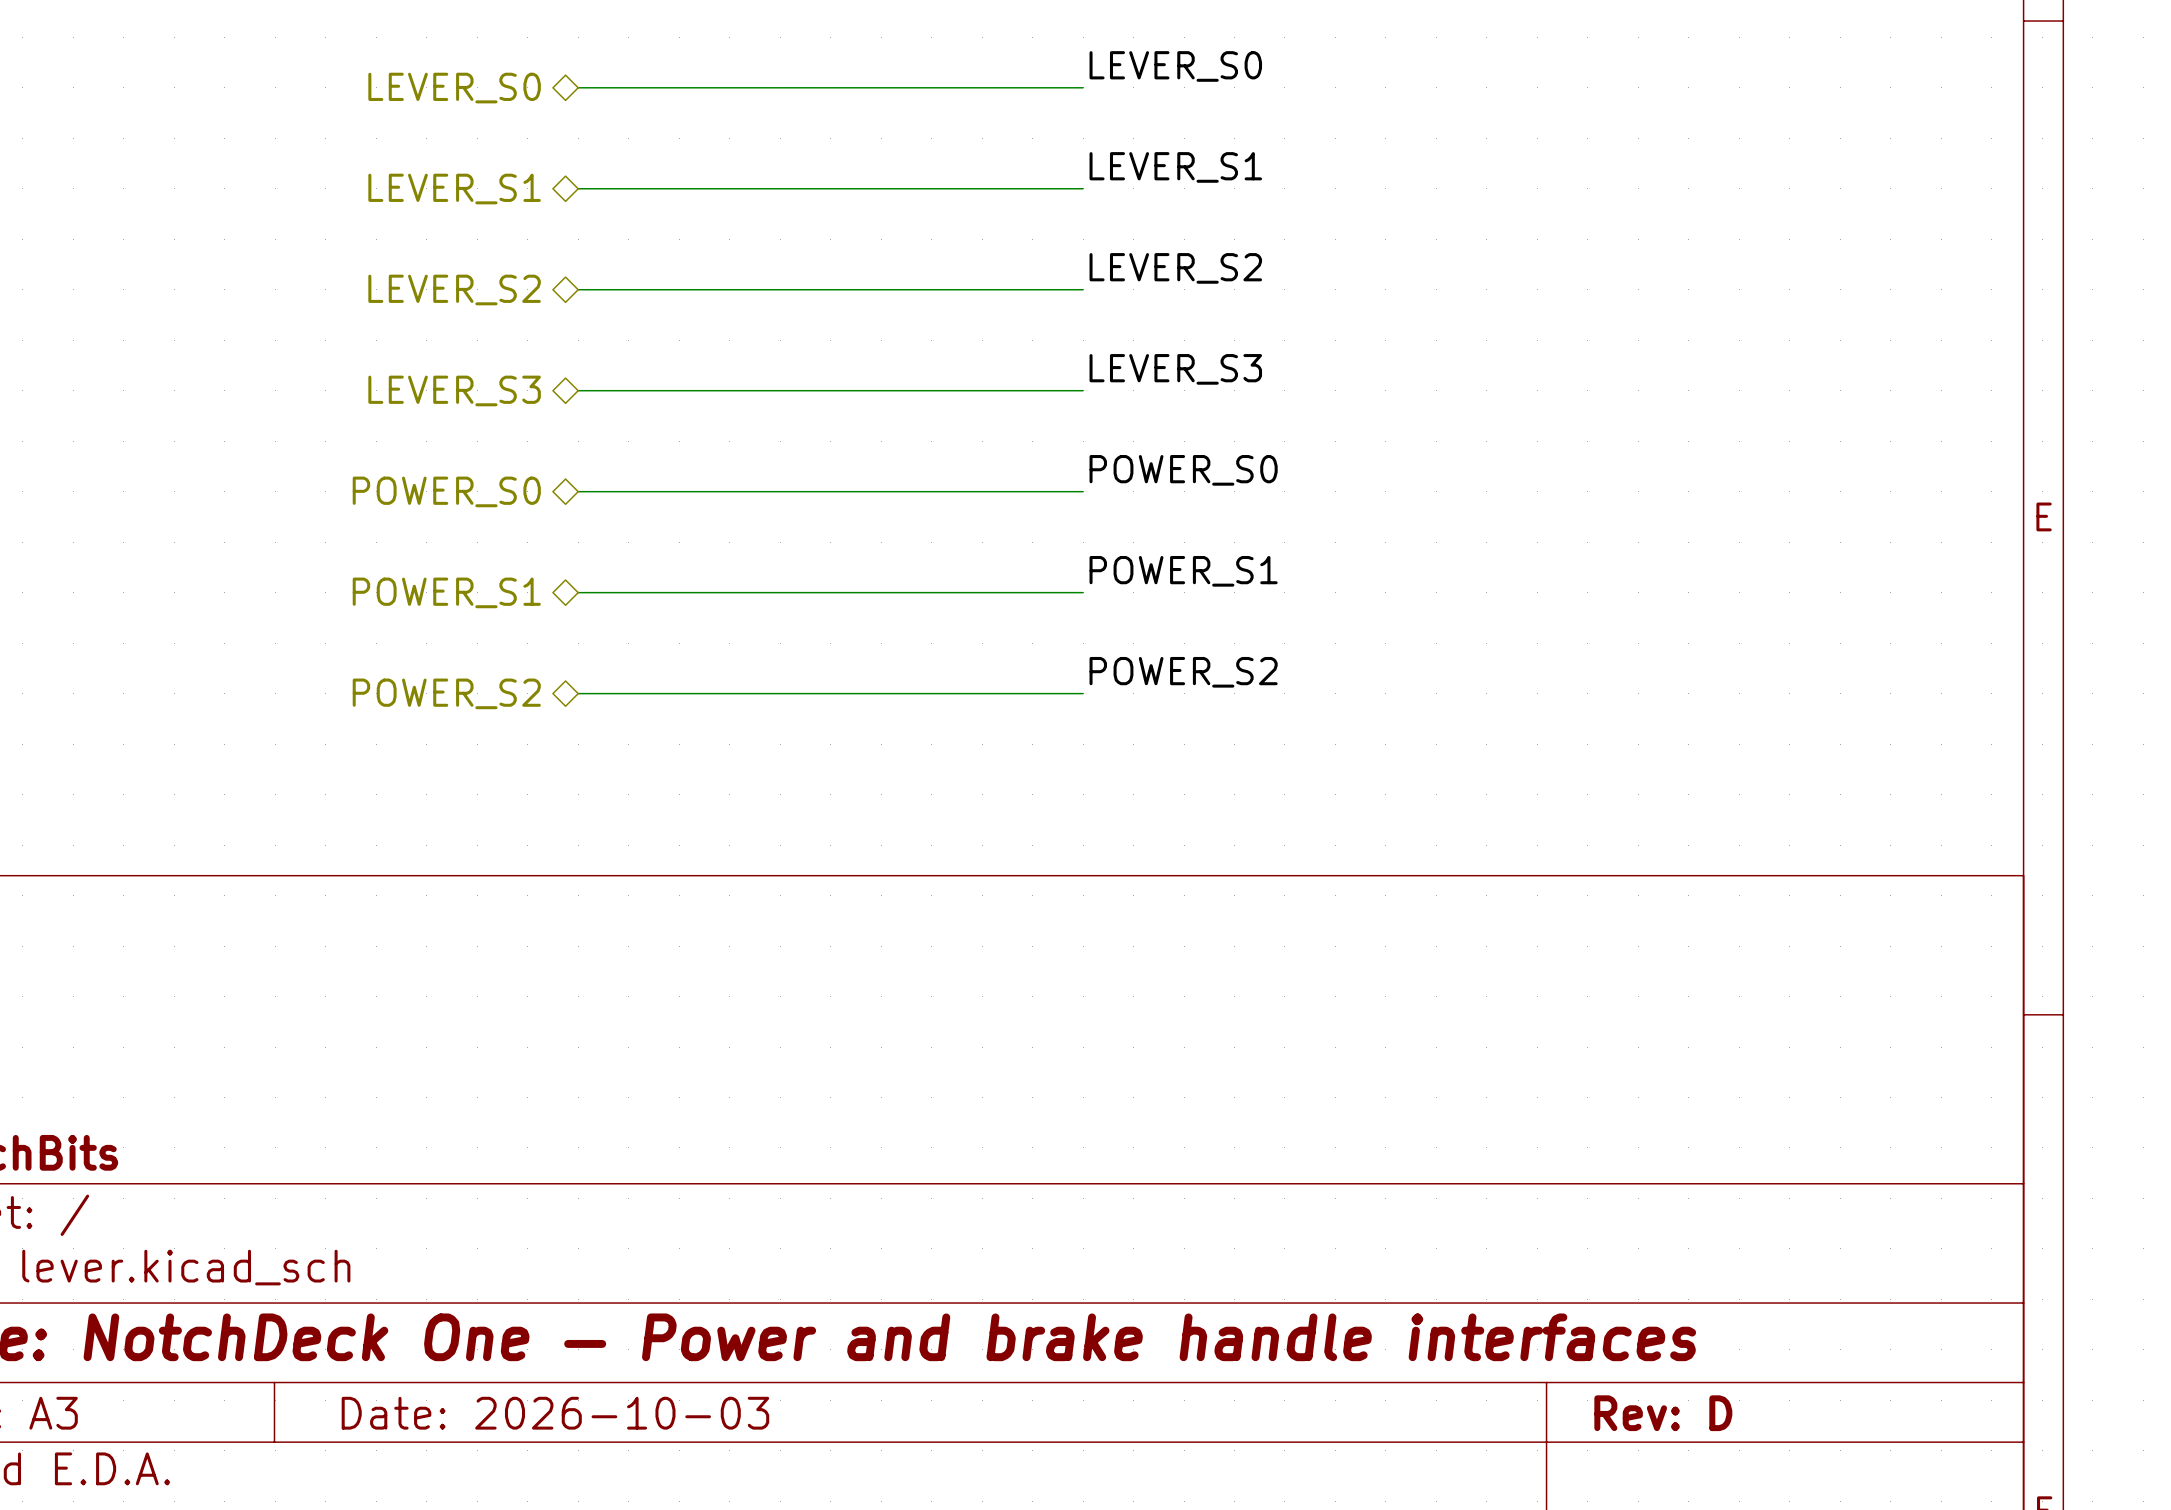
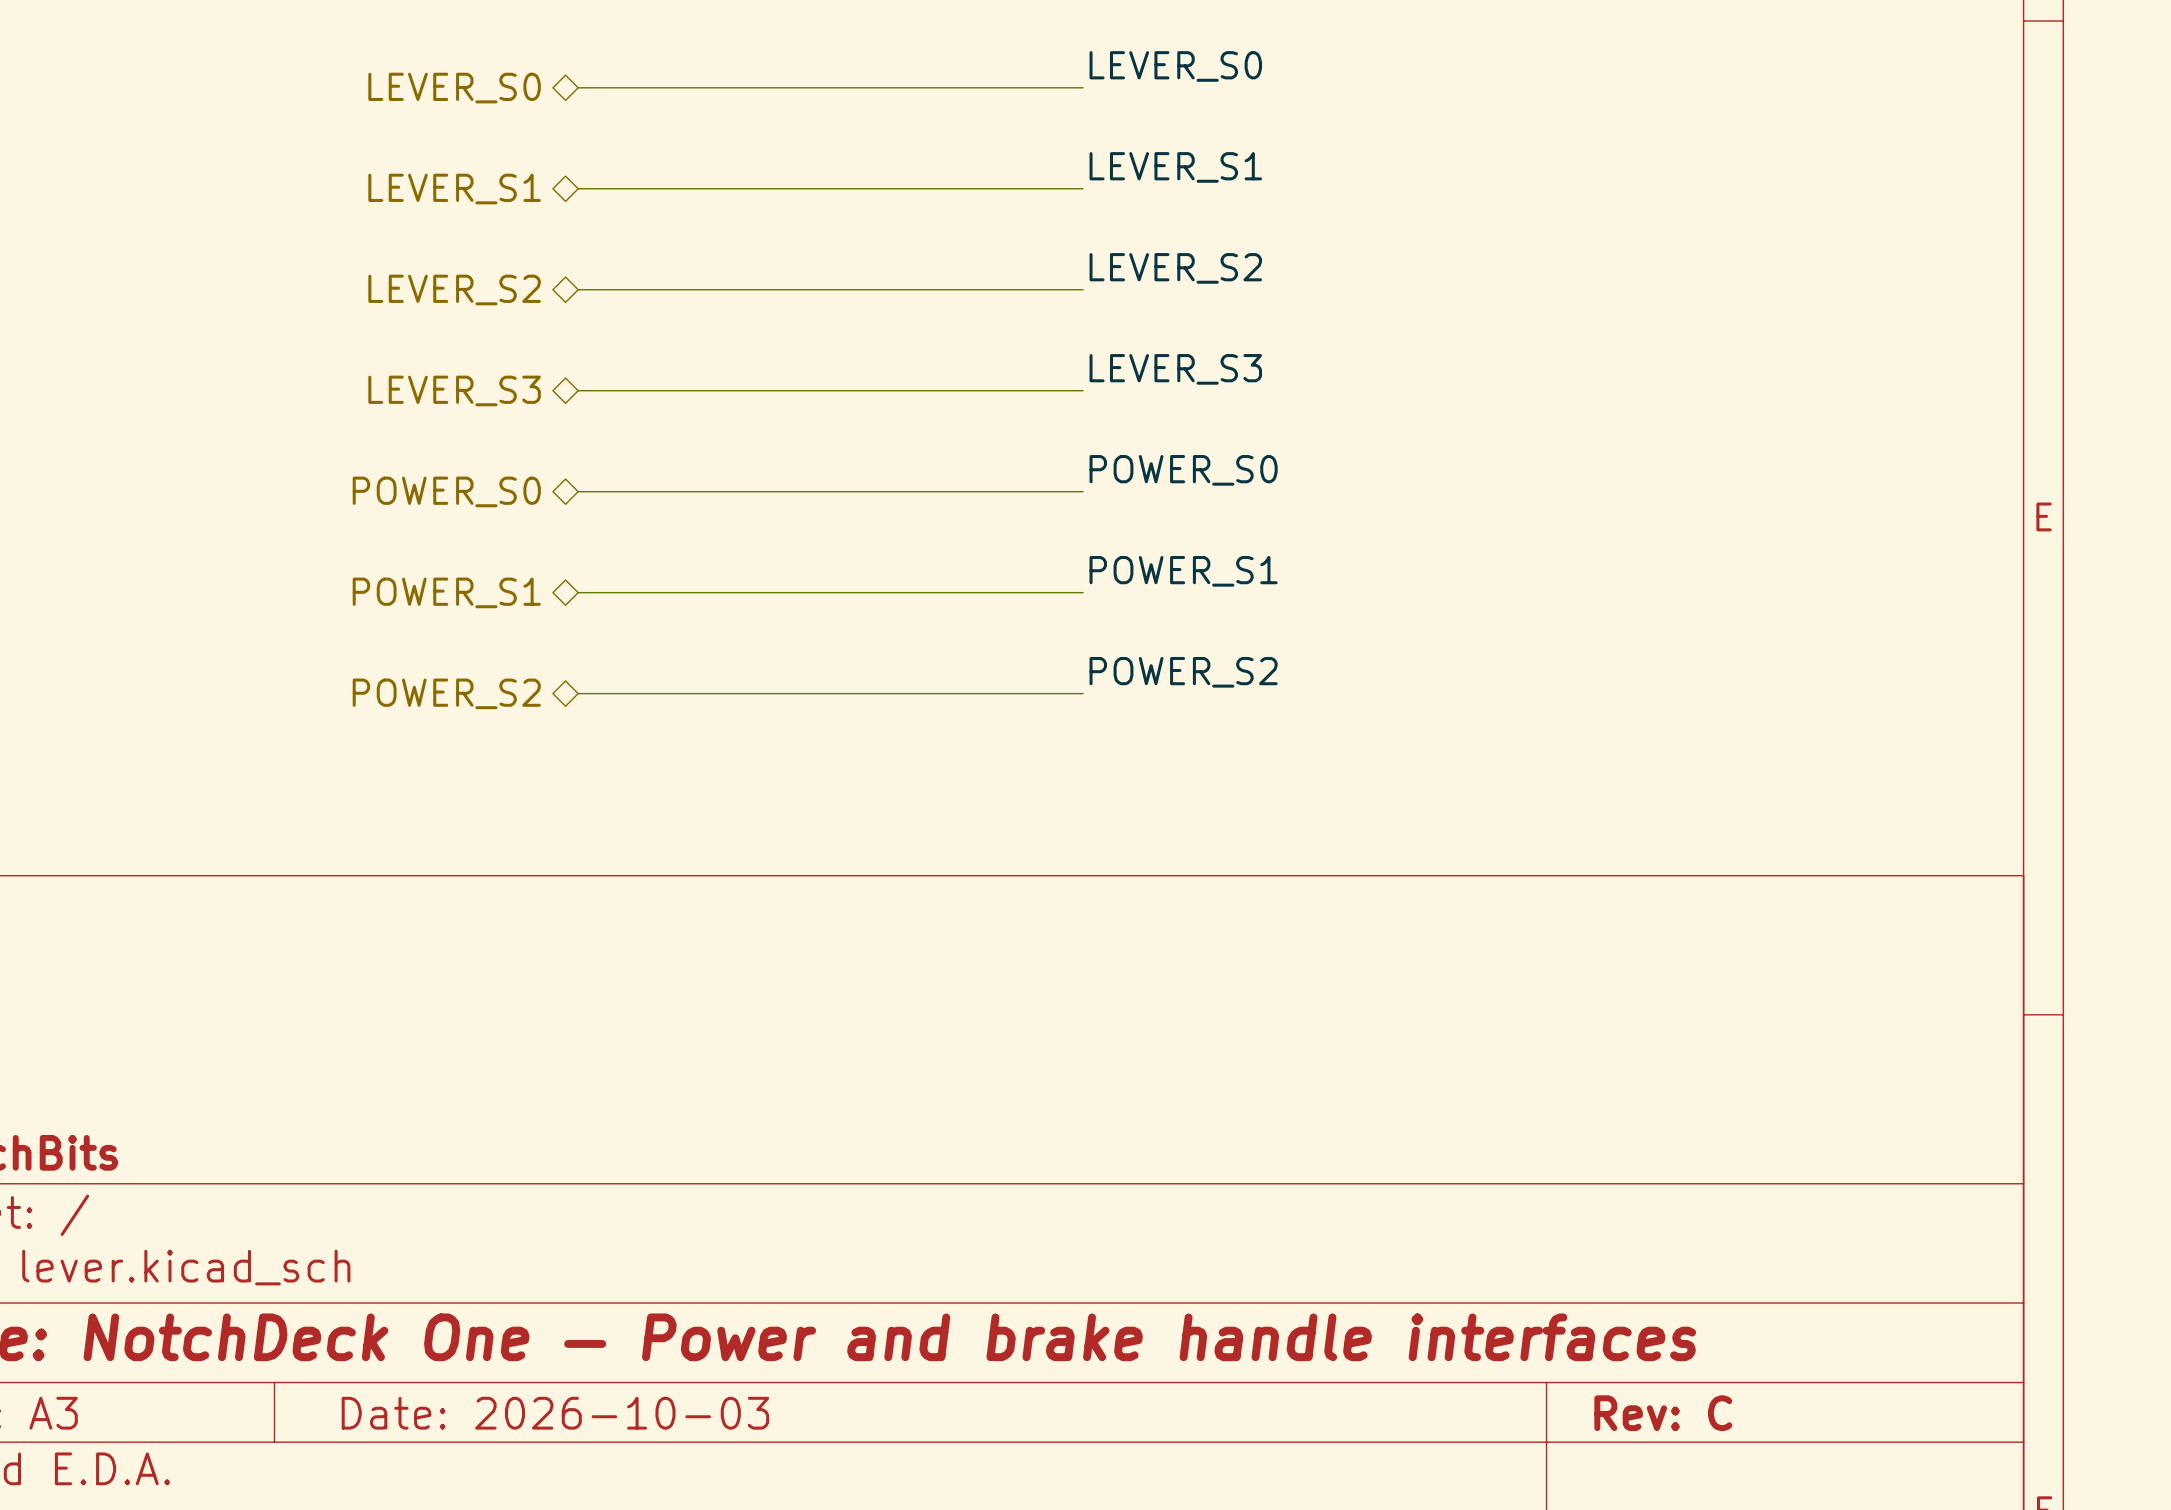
title block: Rev: D (1663, 1413) -> Rev: C (1663, 1413)

